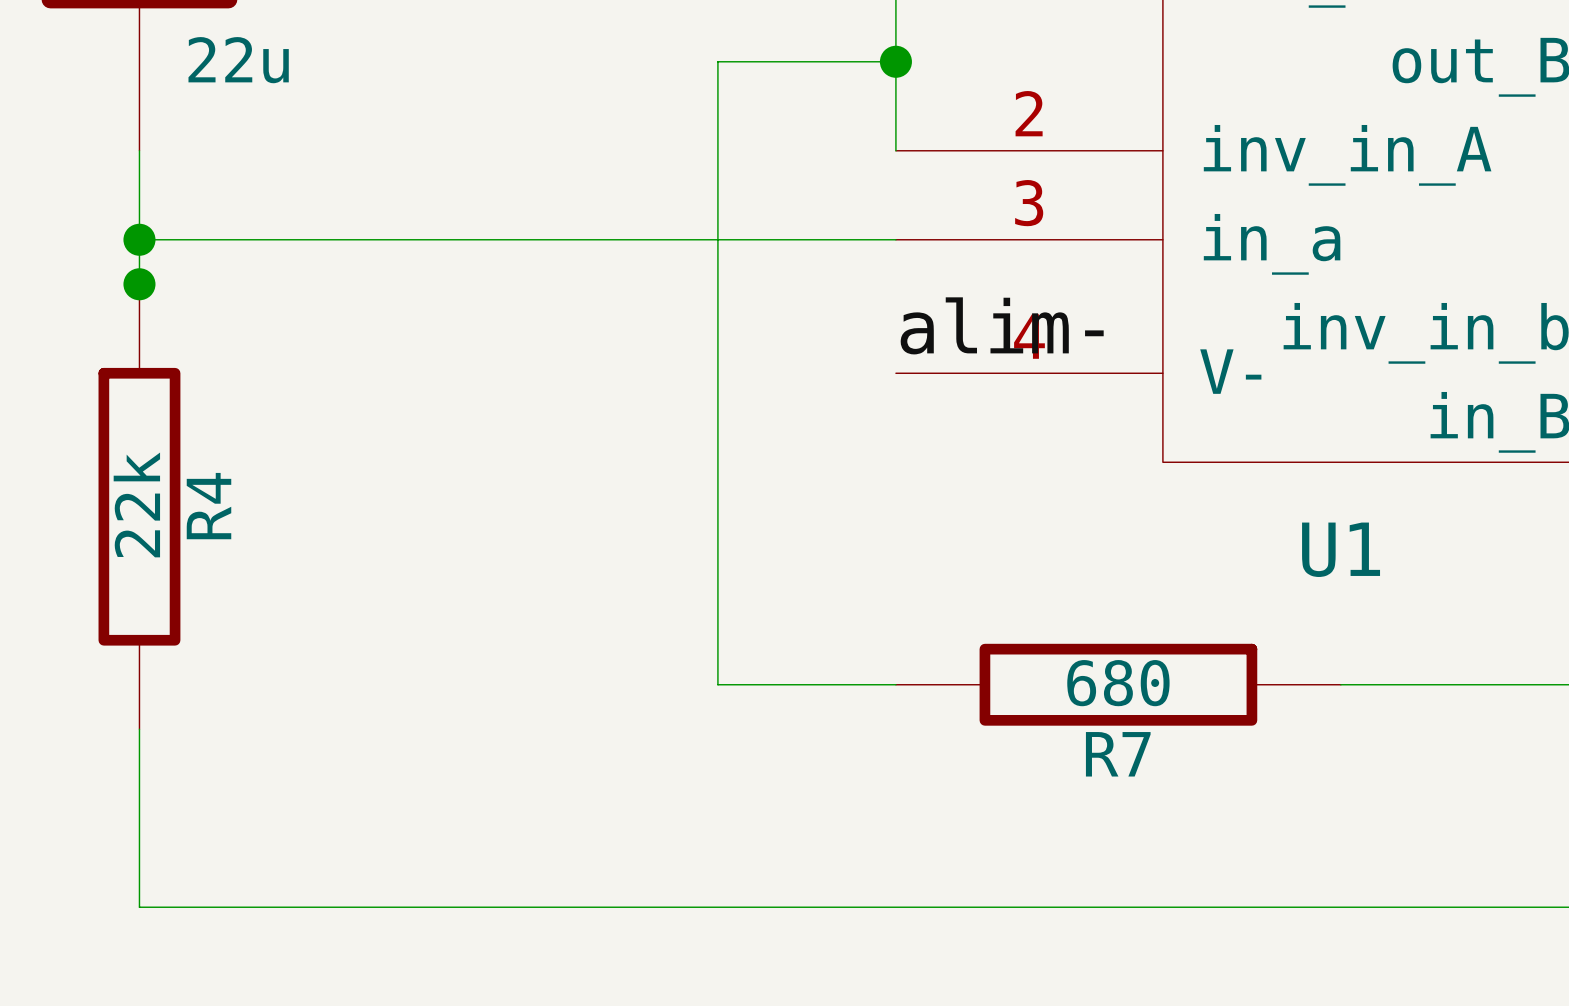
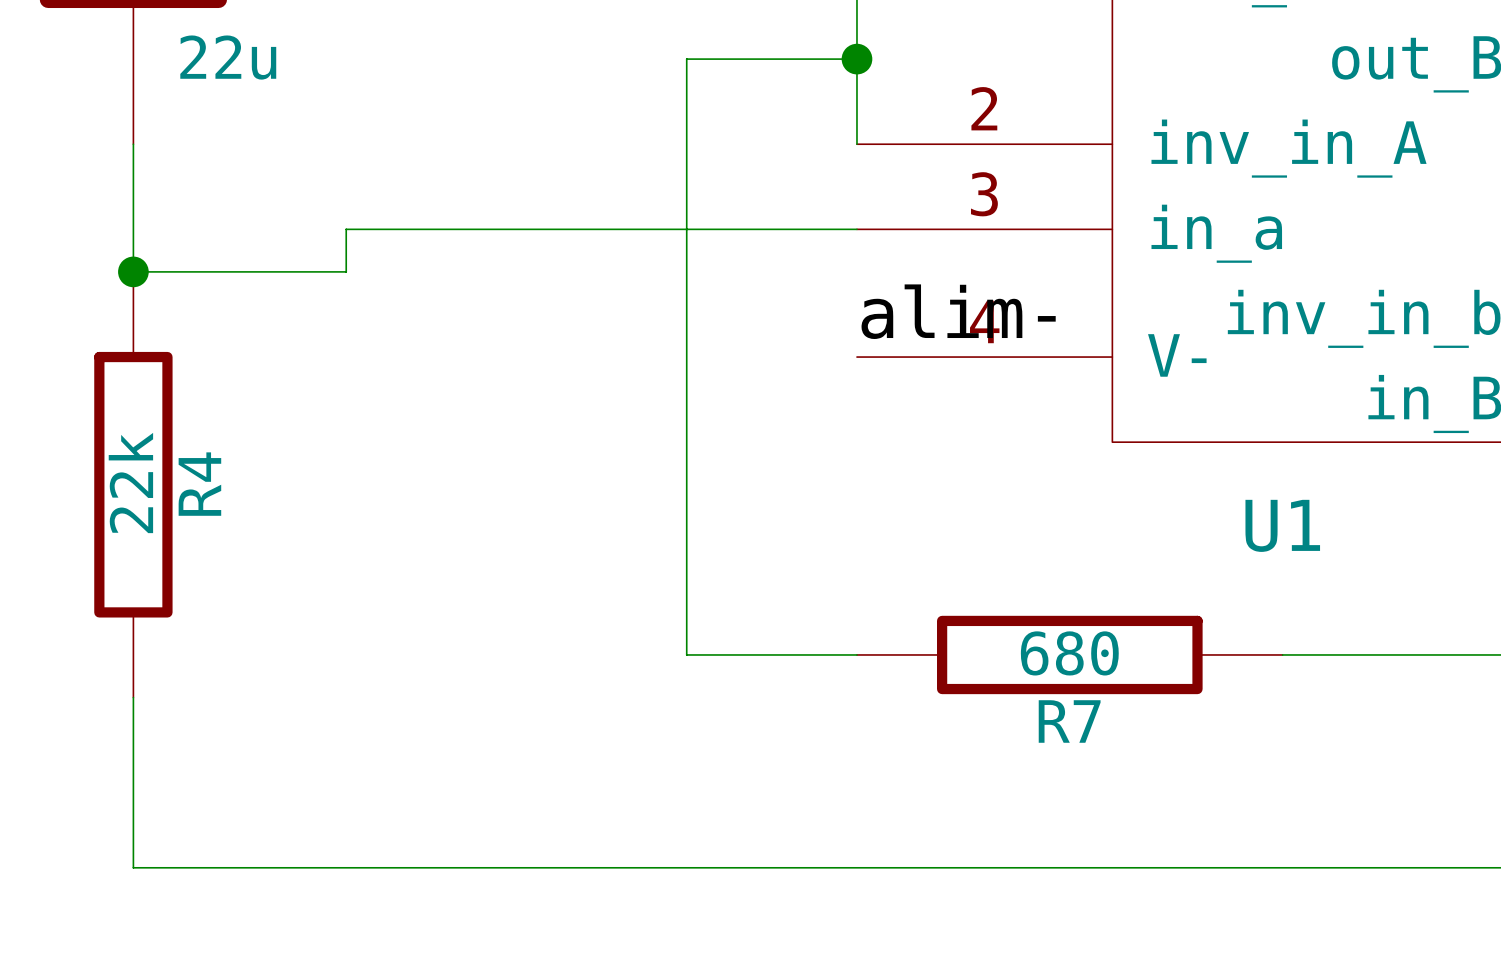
wire: (139, 239) (361, 239) -> (133, 271) (346, 271) (346, 229)
junction: (139, 239) -> none

